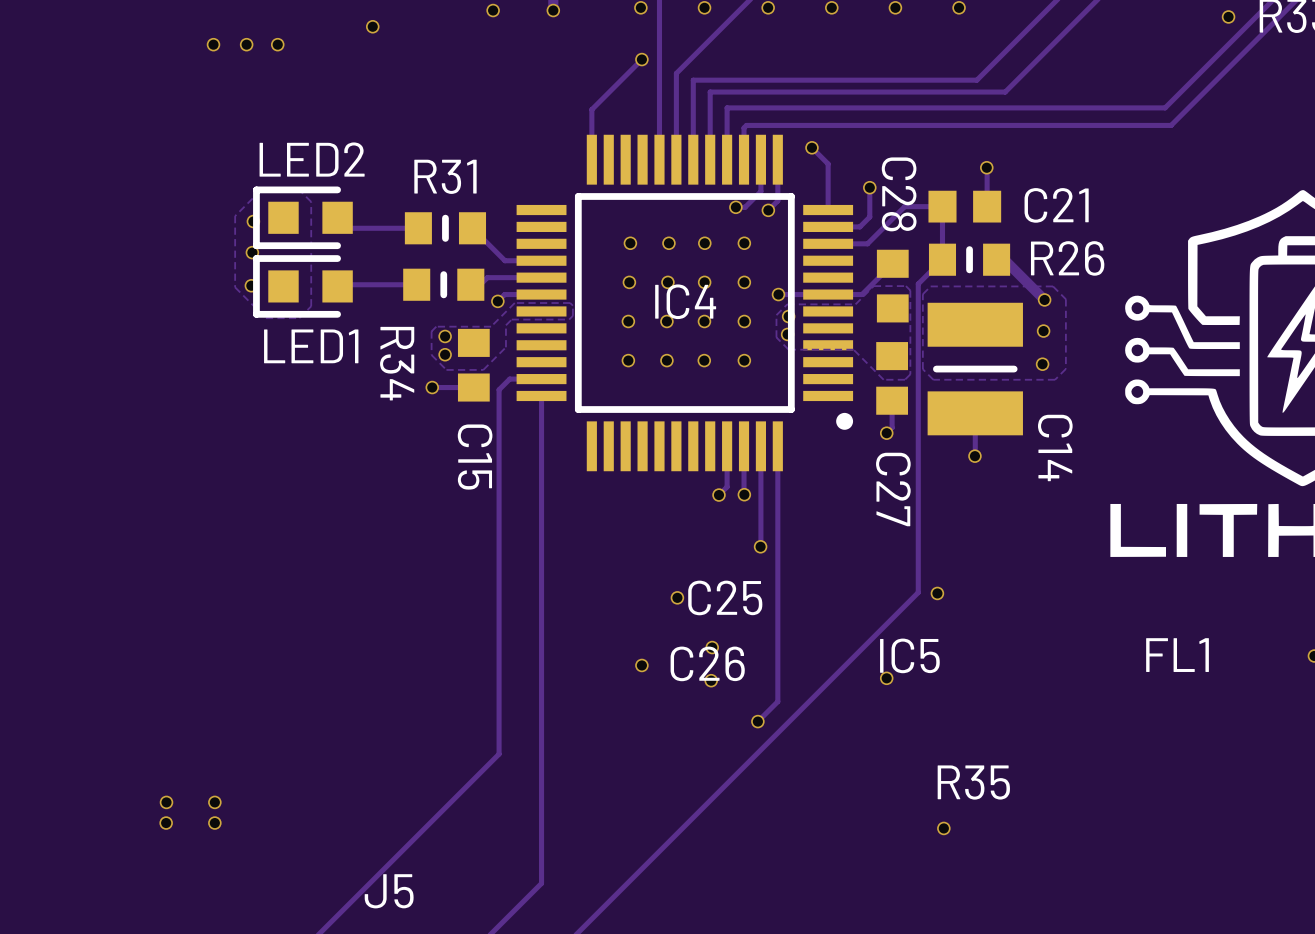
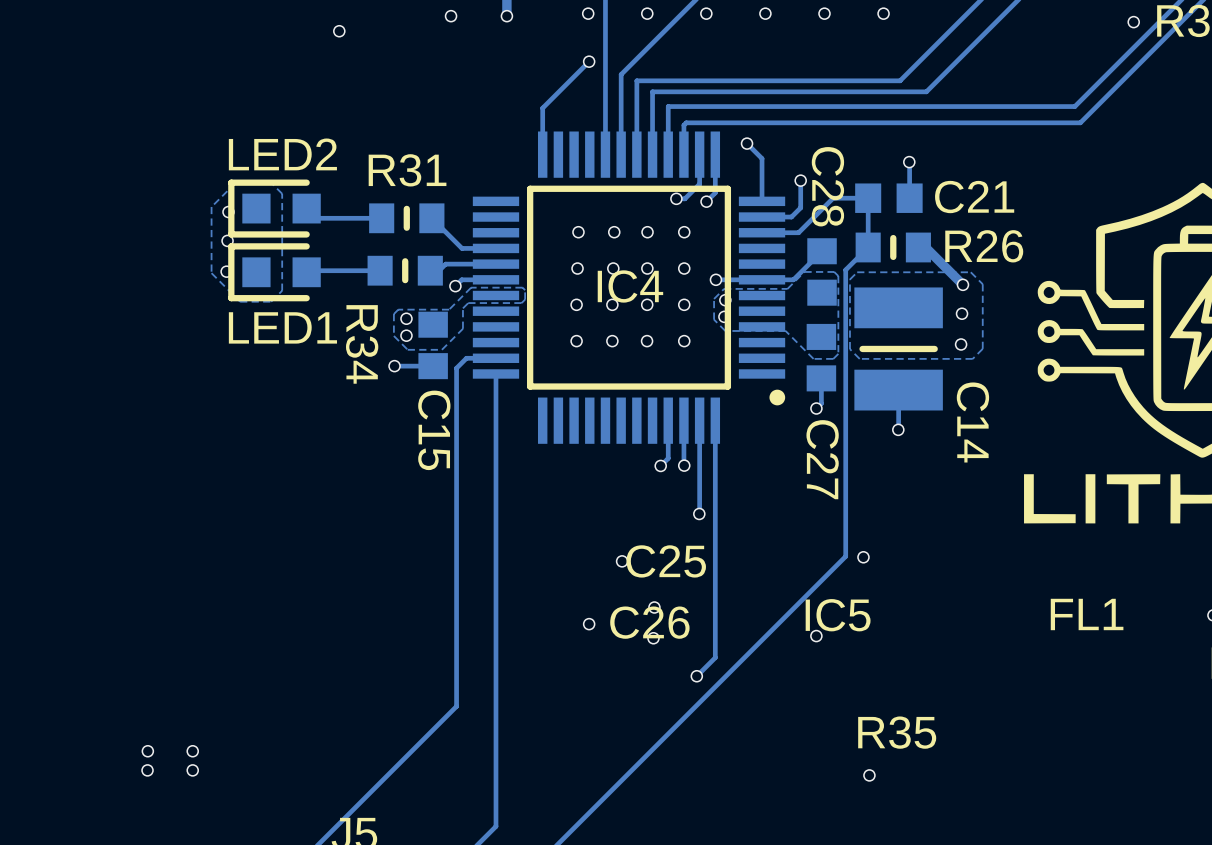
via: (213, 44) -> none
via: (246, 44) -> none
via: (277, 44) -> none

